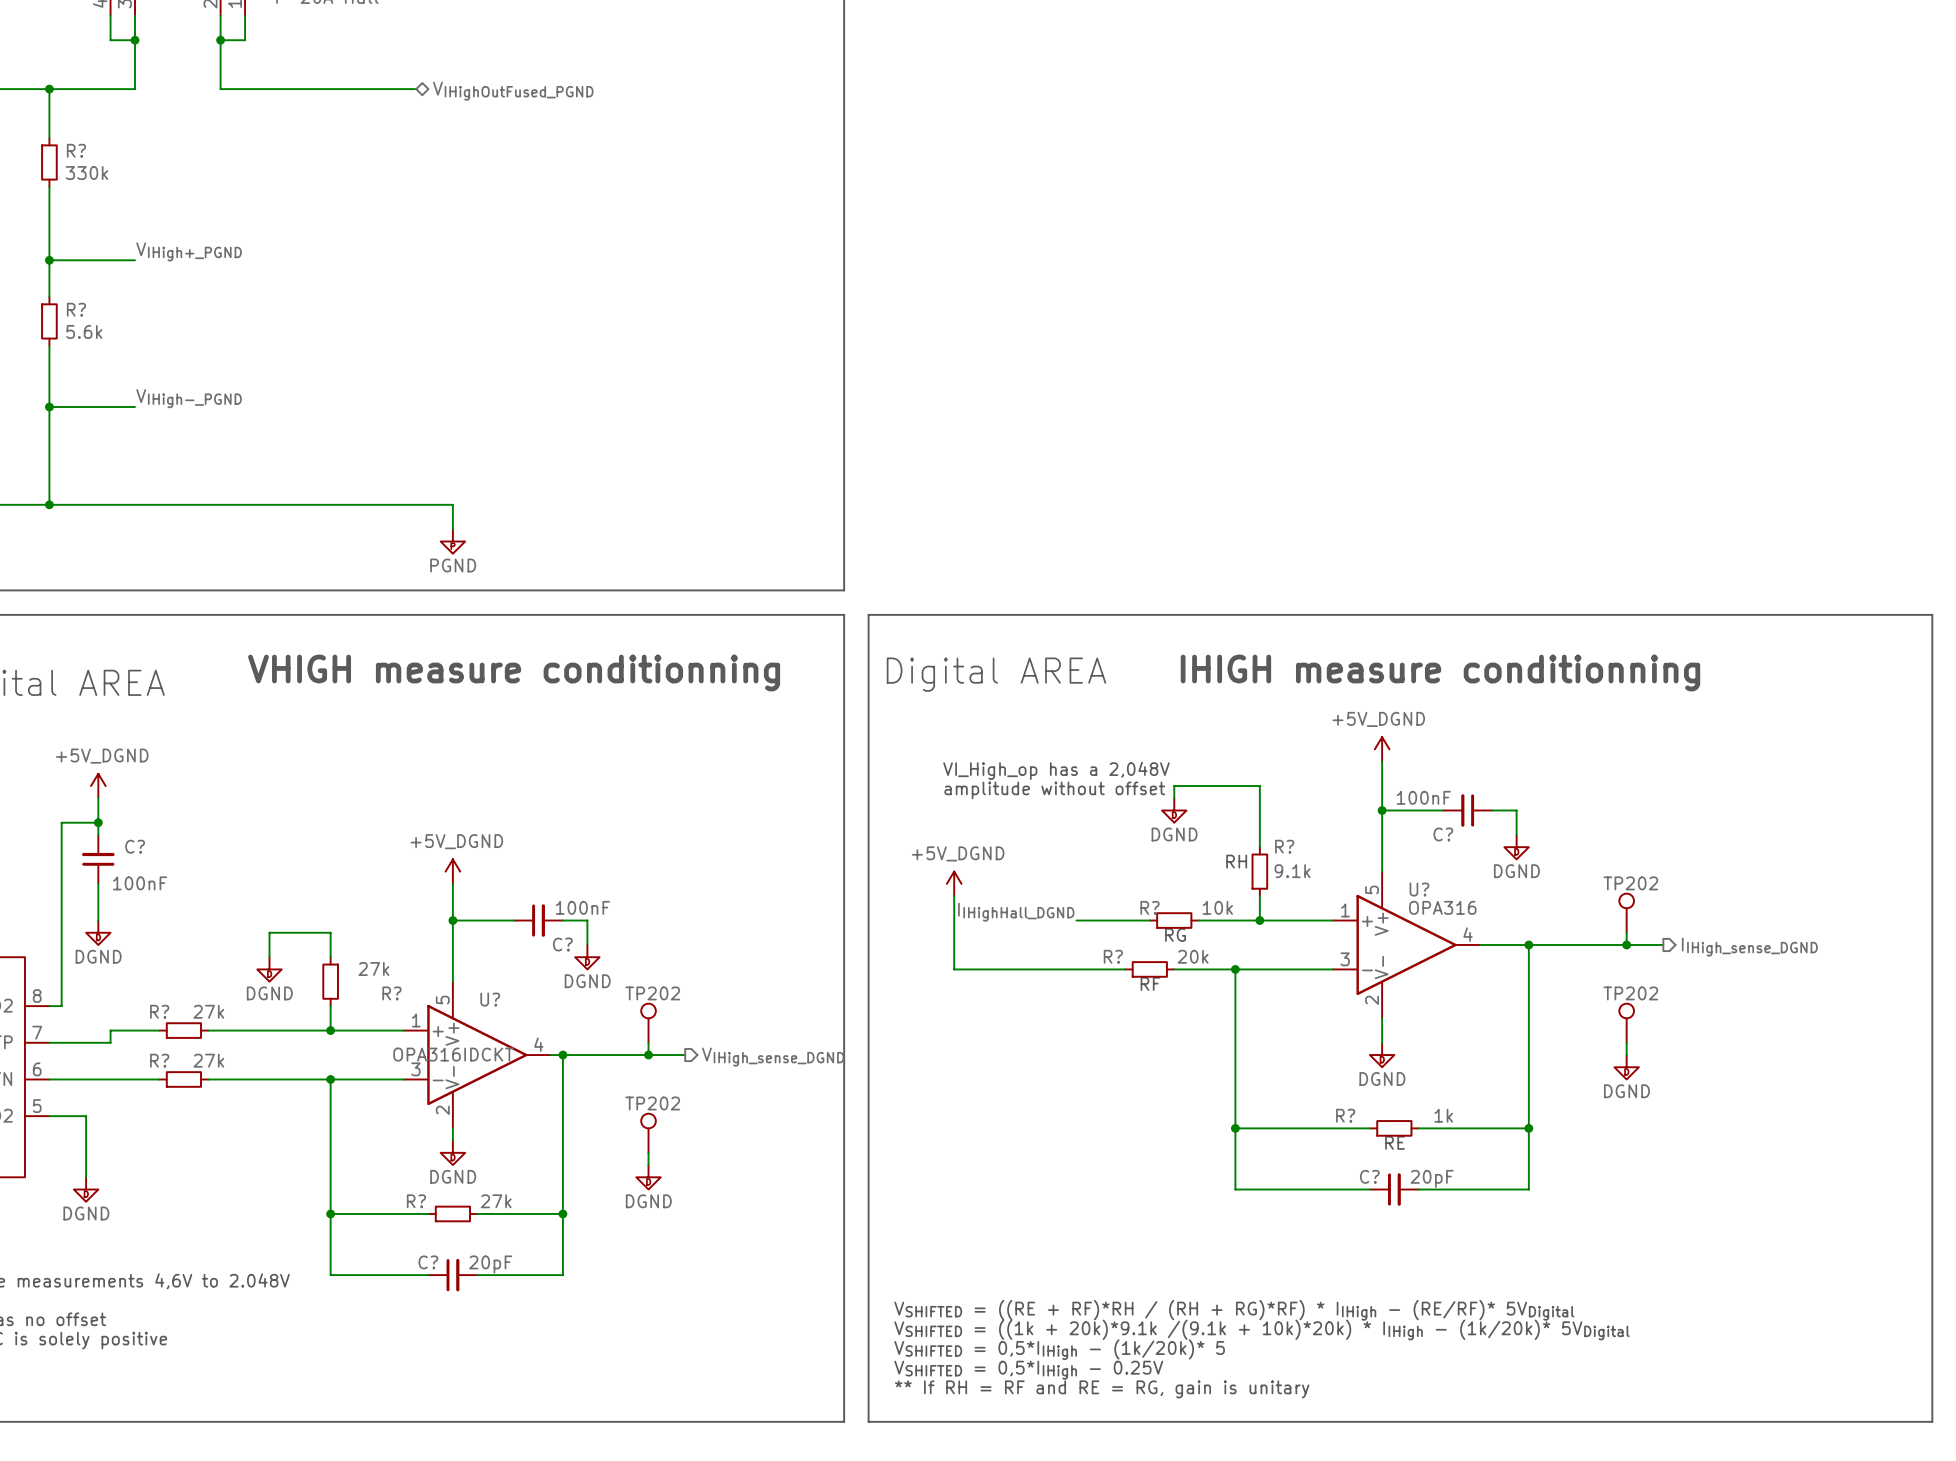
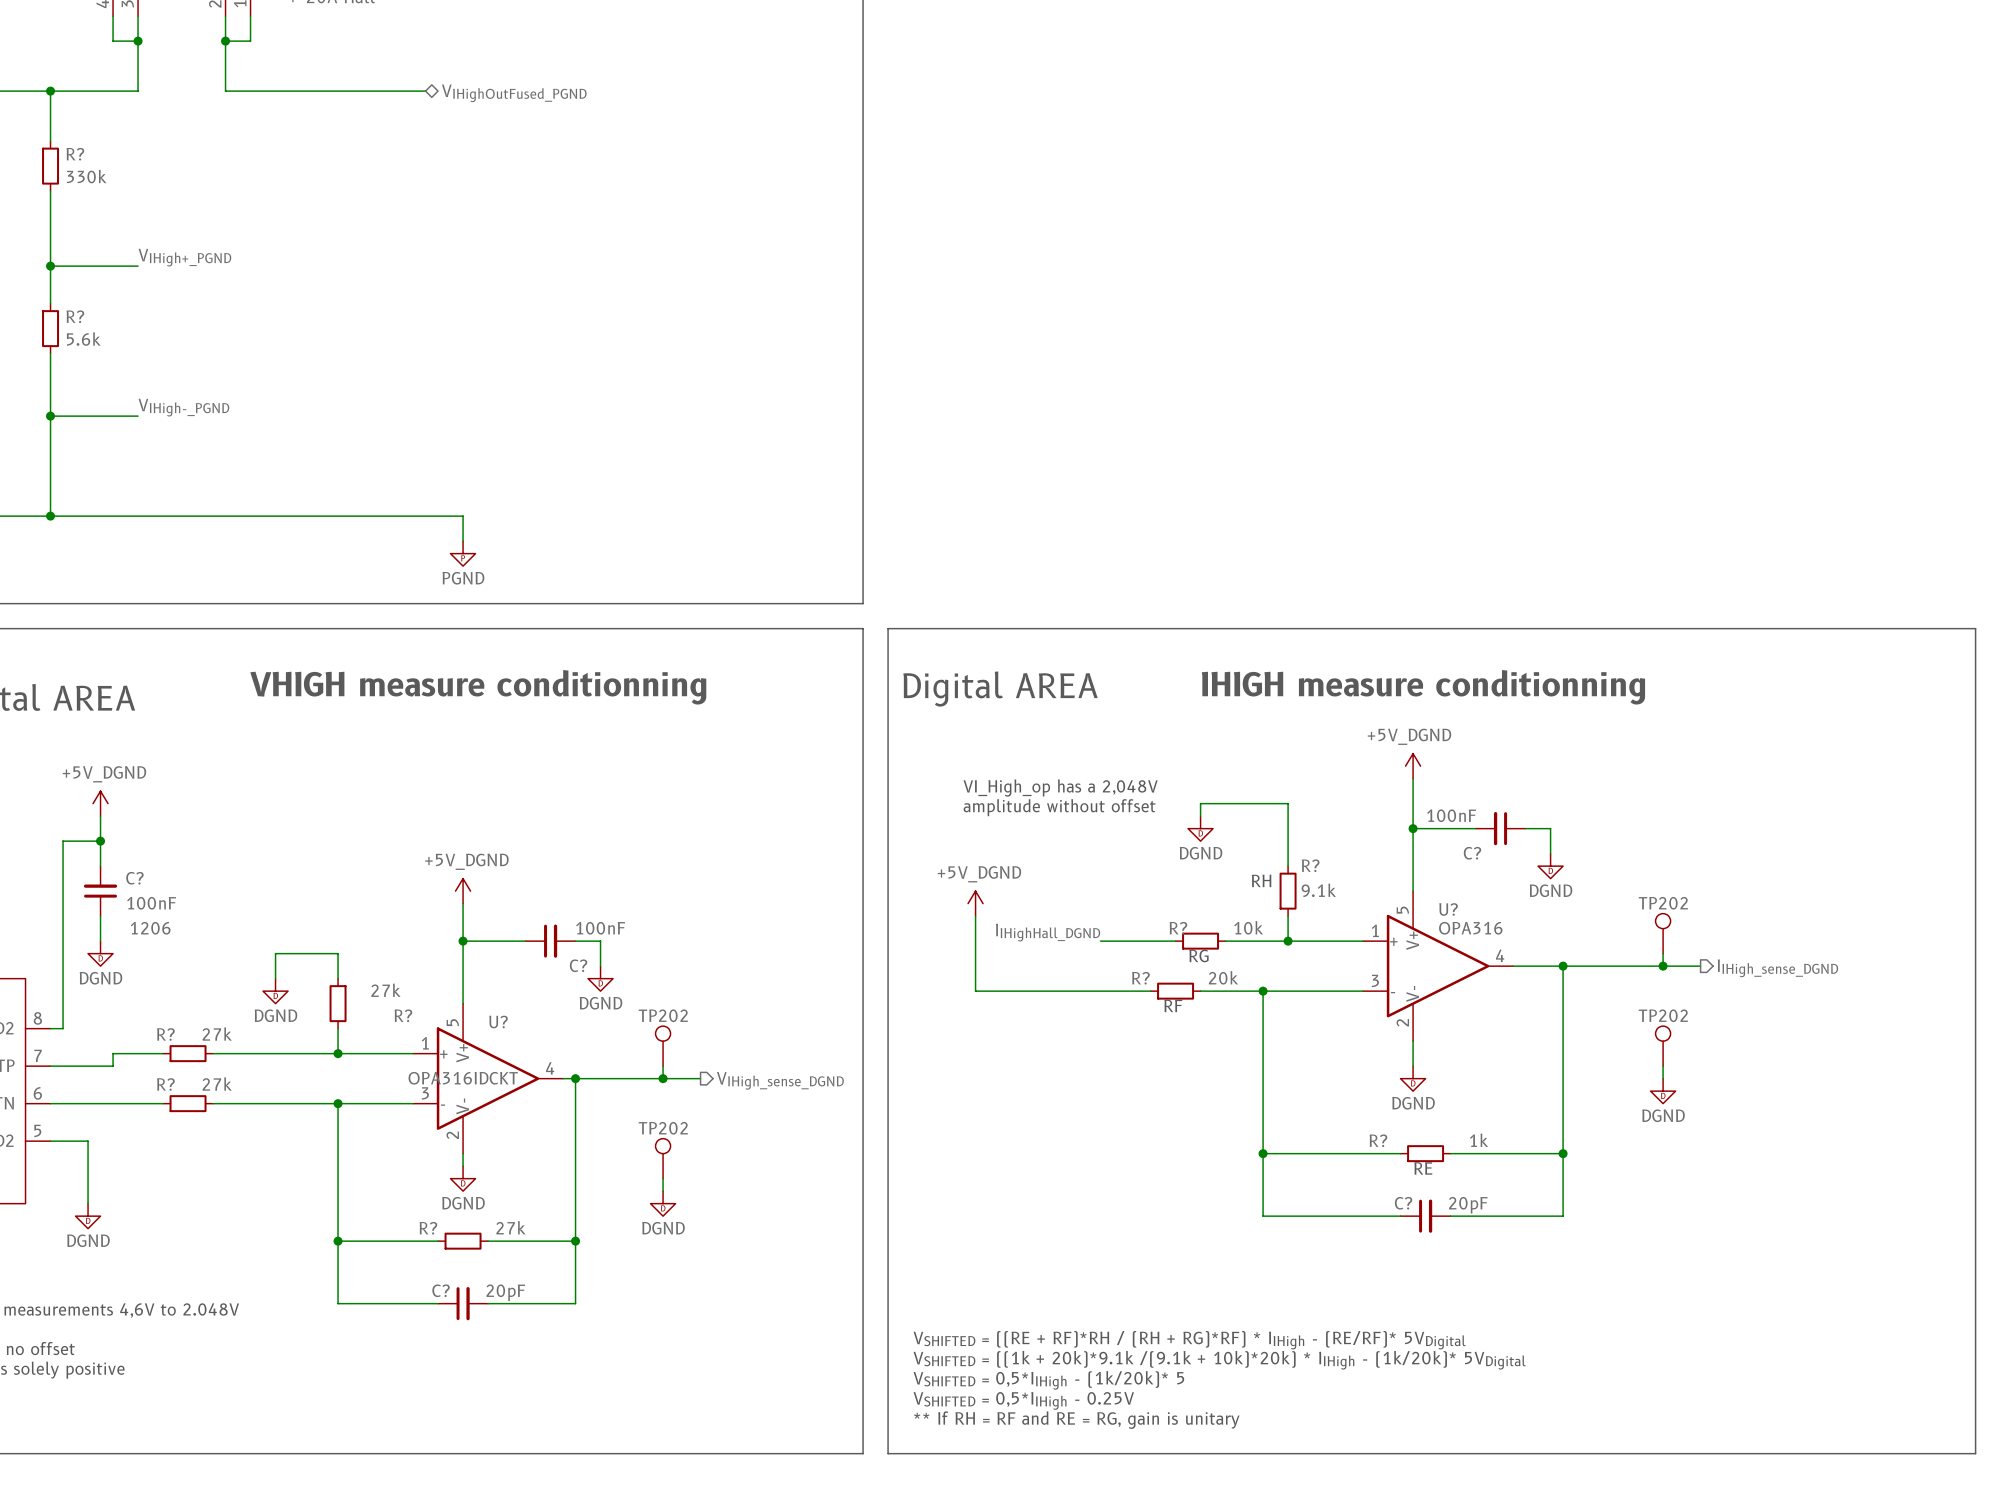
C?: 100nF (98, 859) -> none
C?: none -> 100nF (100, 891)

